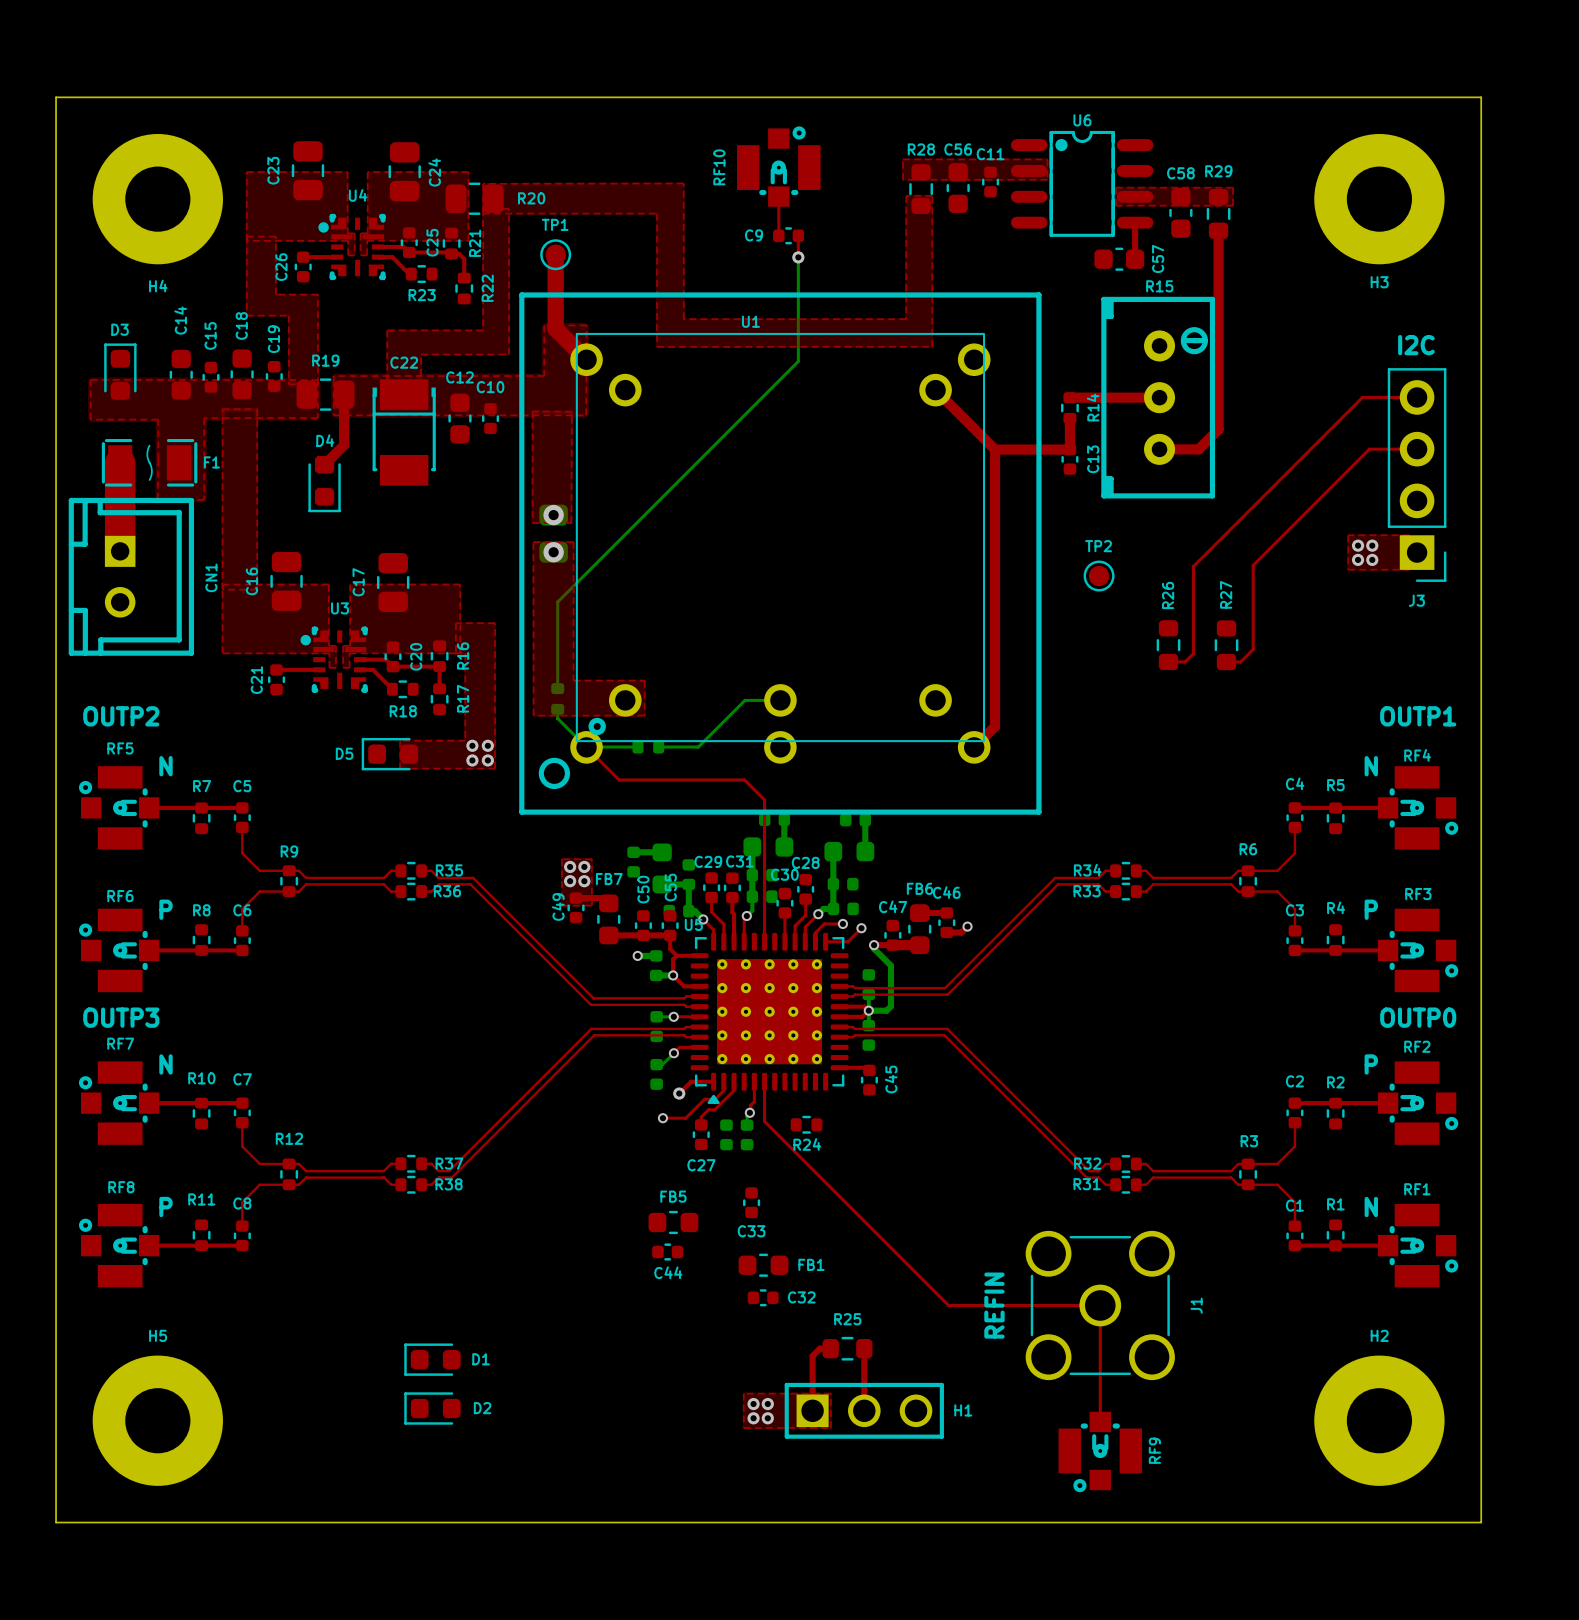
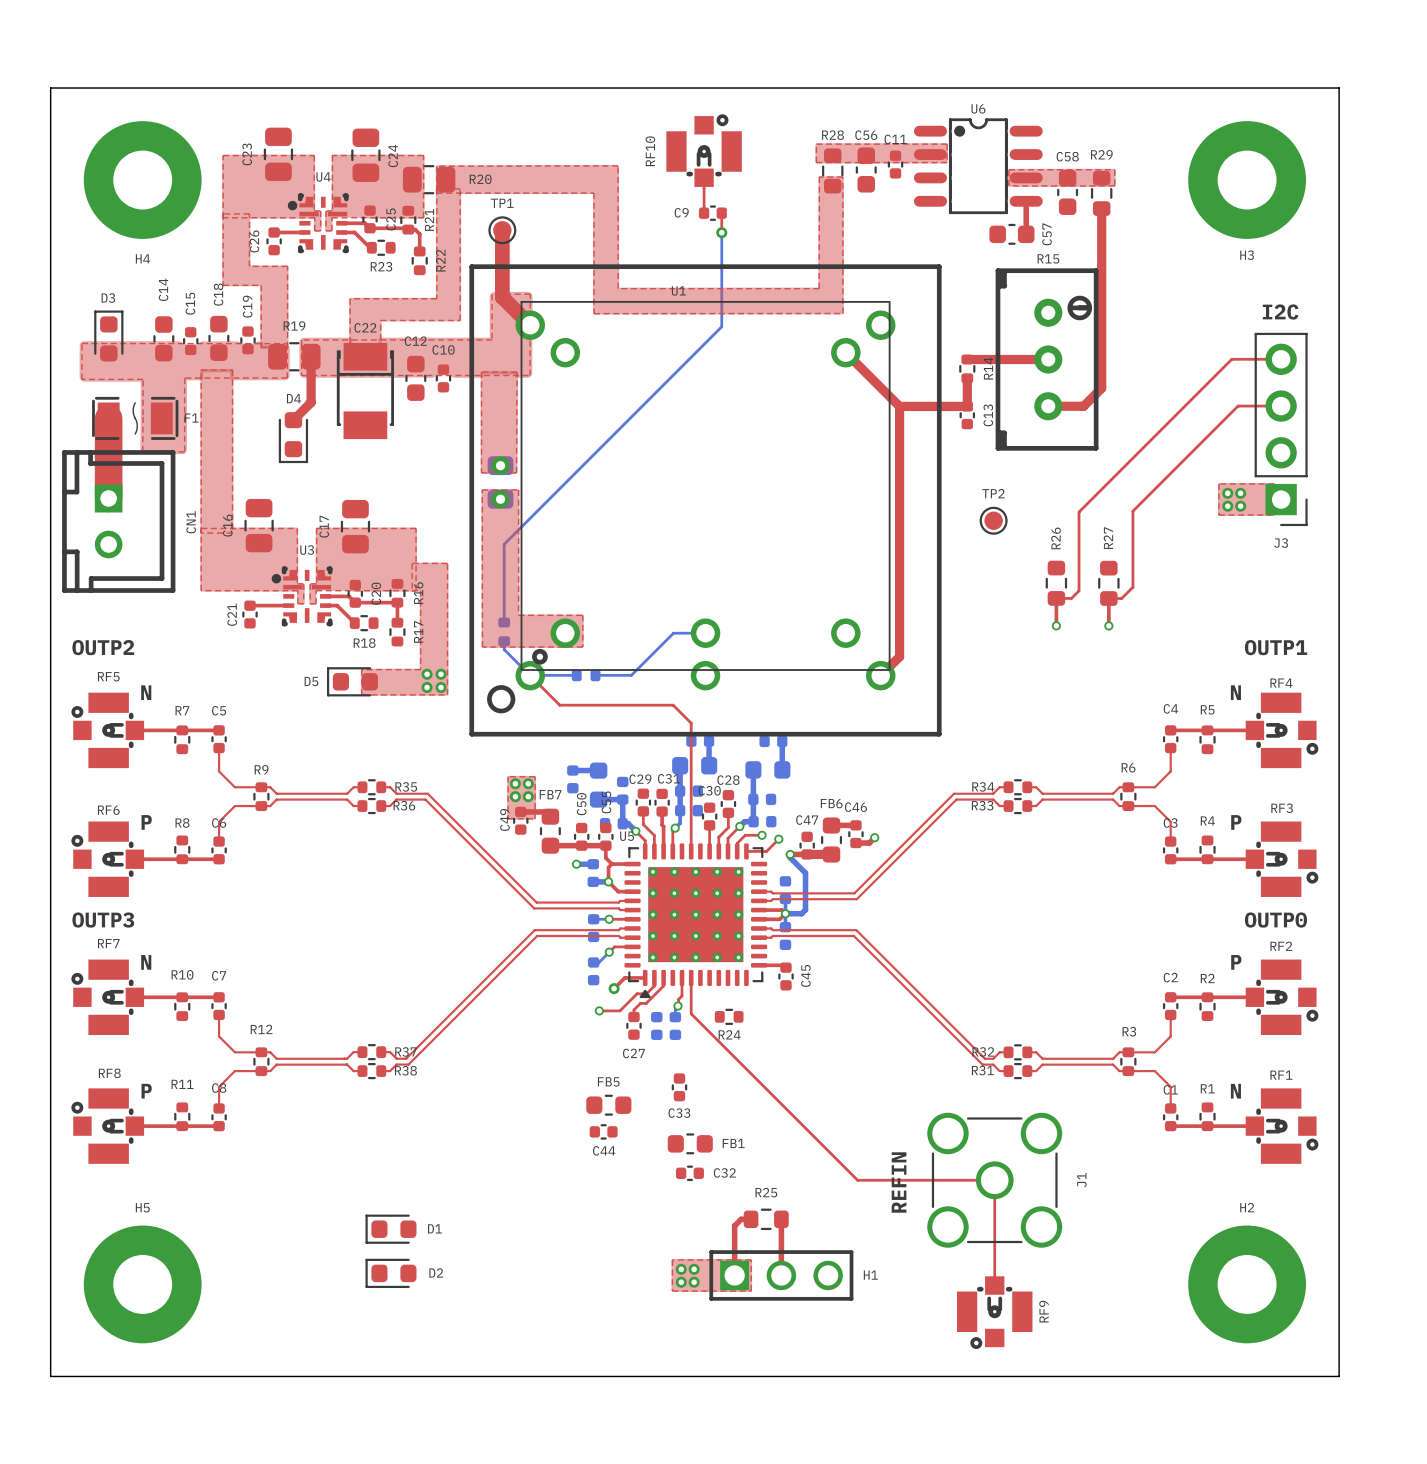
top track: none -> (1056, 598) (1056, 625)
top track: none -> (1108, 598) (1108, 625)
via: none -> (1056, 625)
via: none -> (1108, 625)

